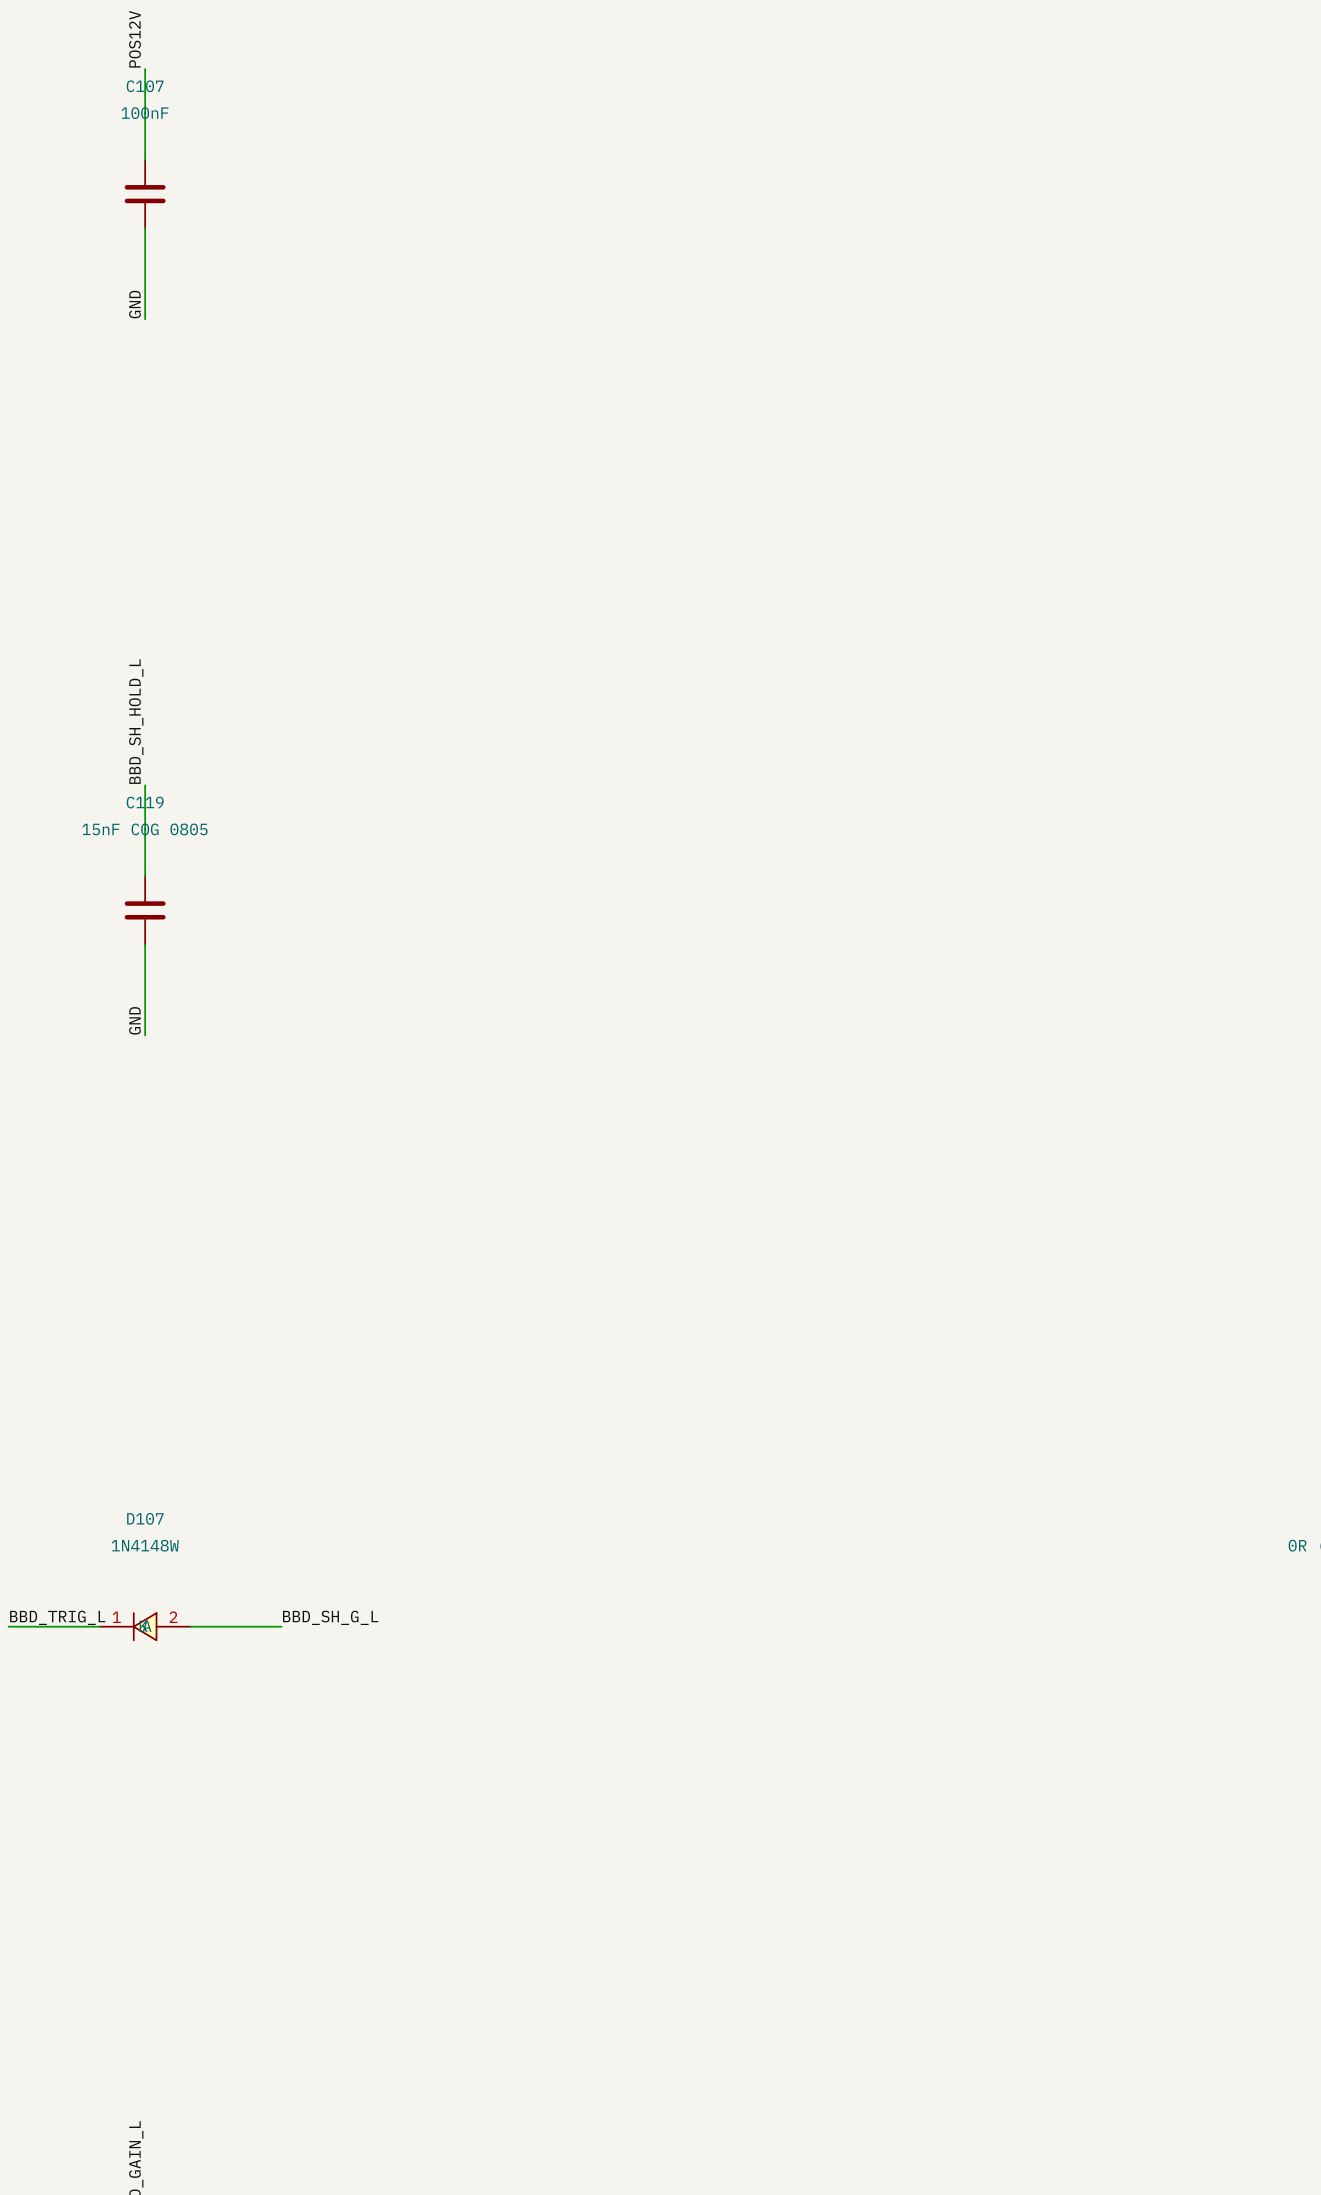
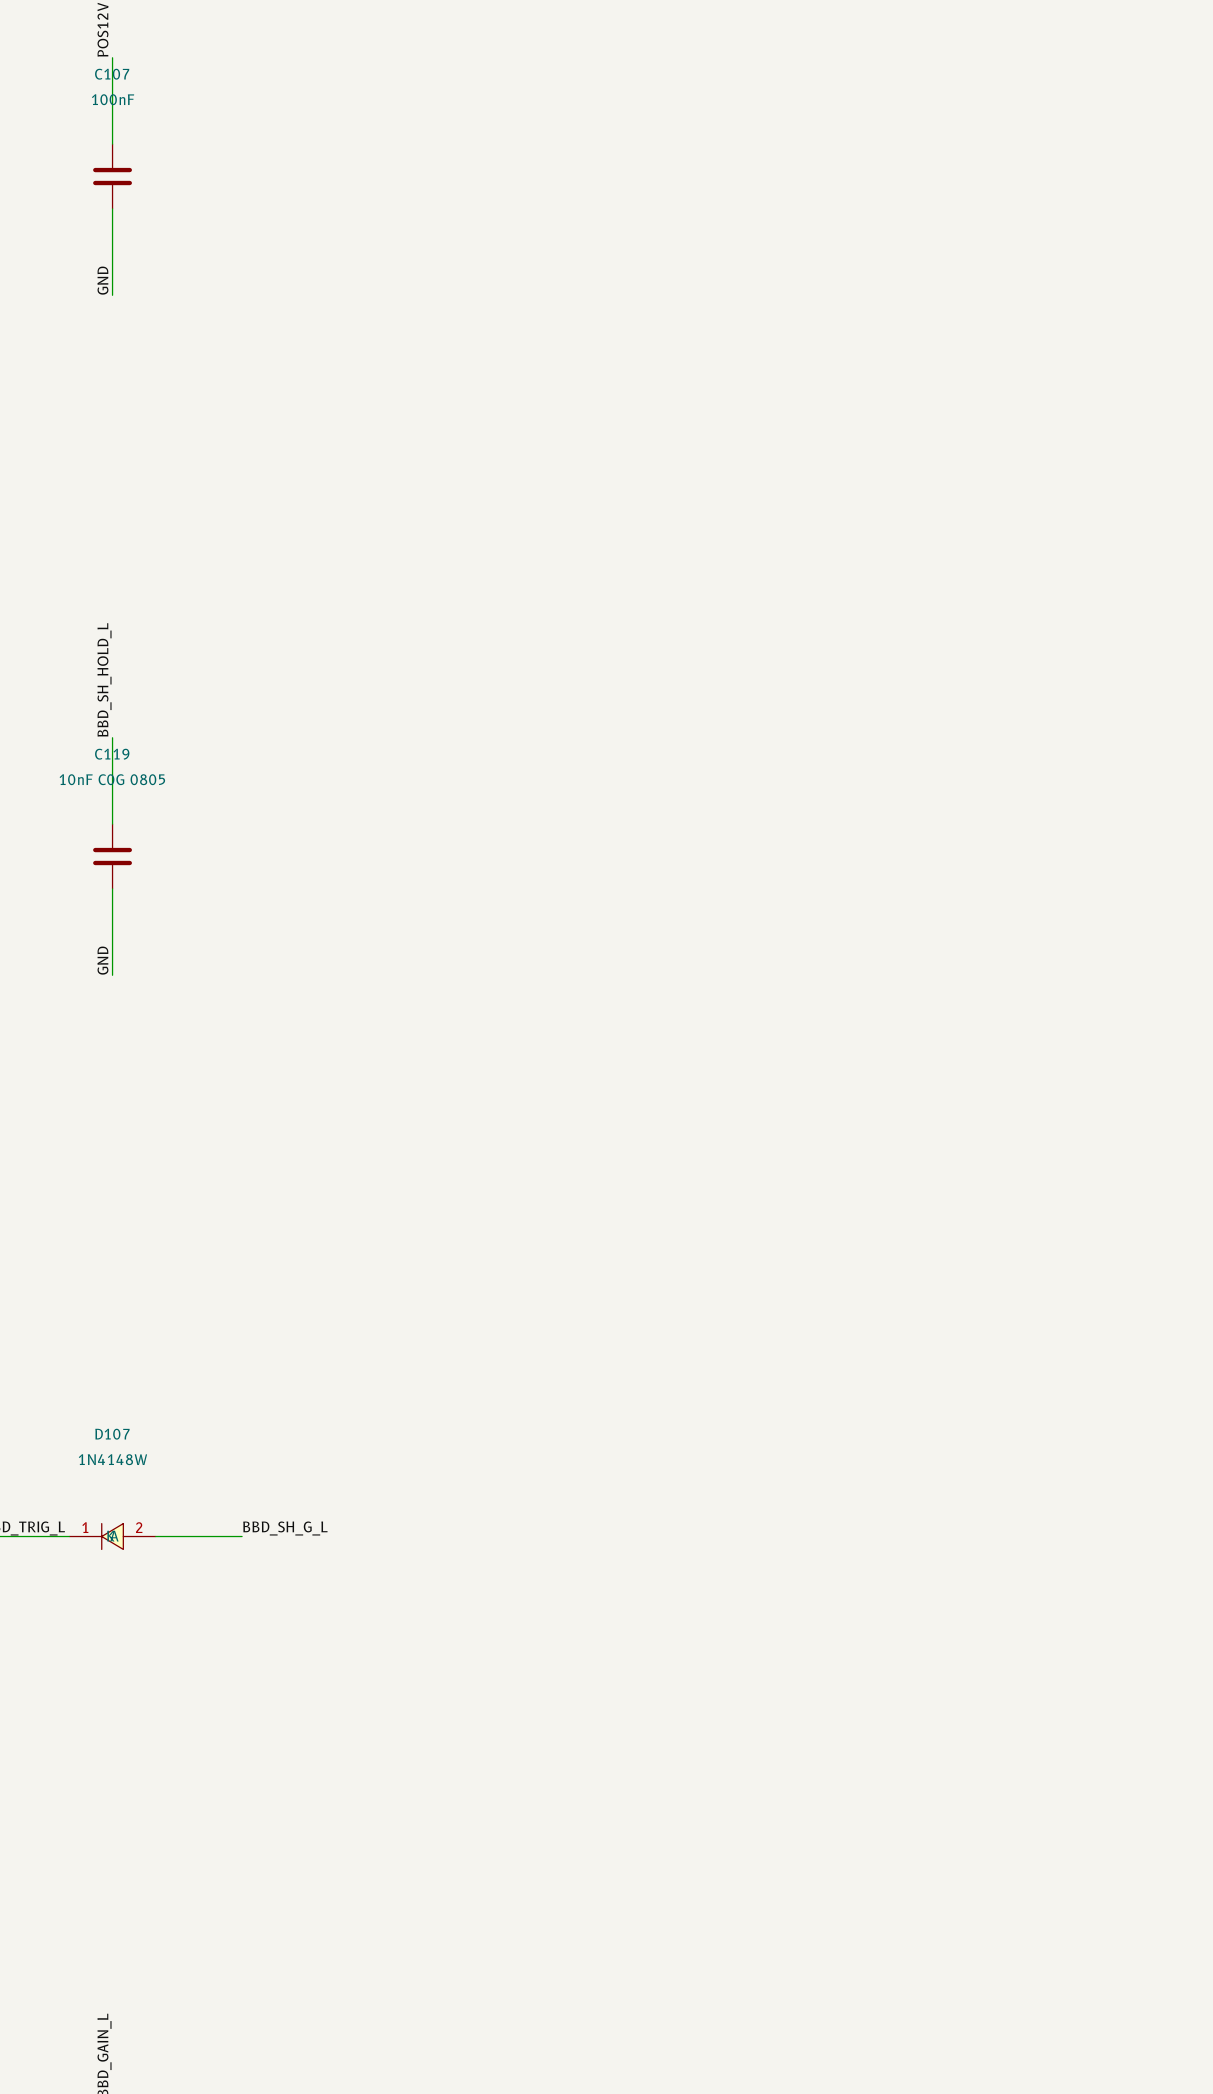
C119 value: 15nF C0G 0805 (145, 829) -> 10nF C0G 0805 (112, 779)

